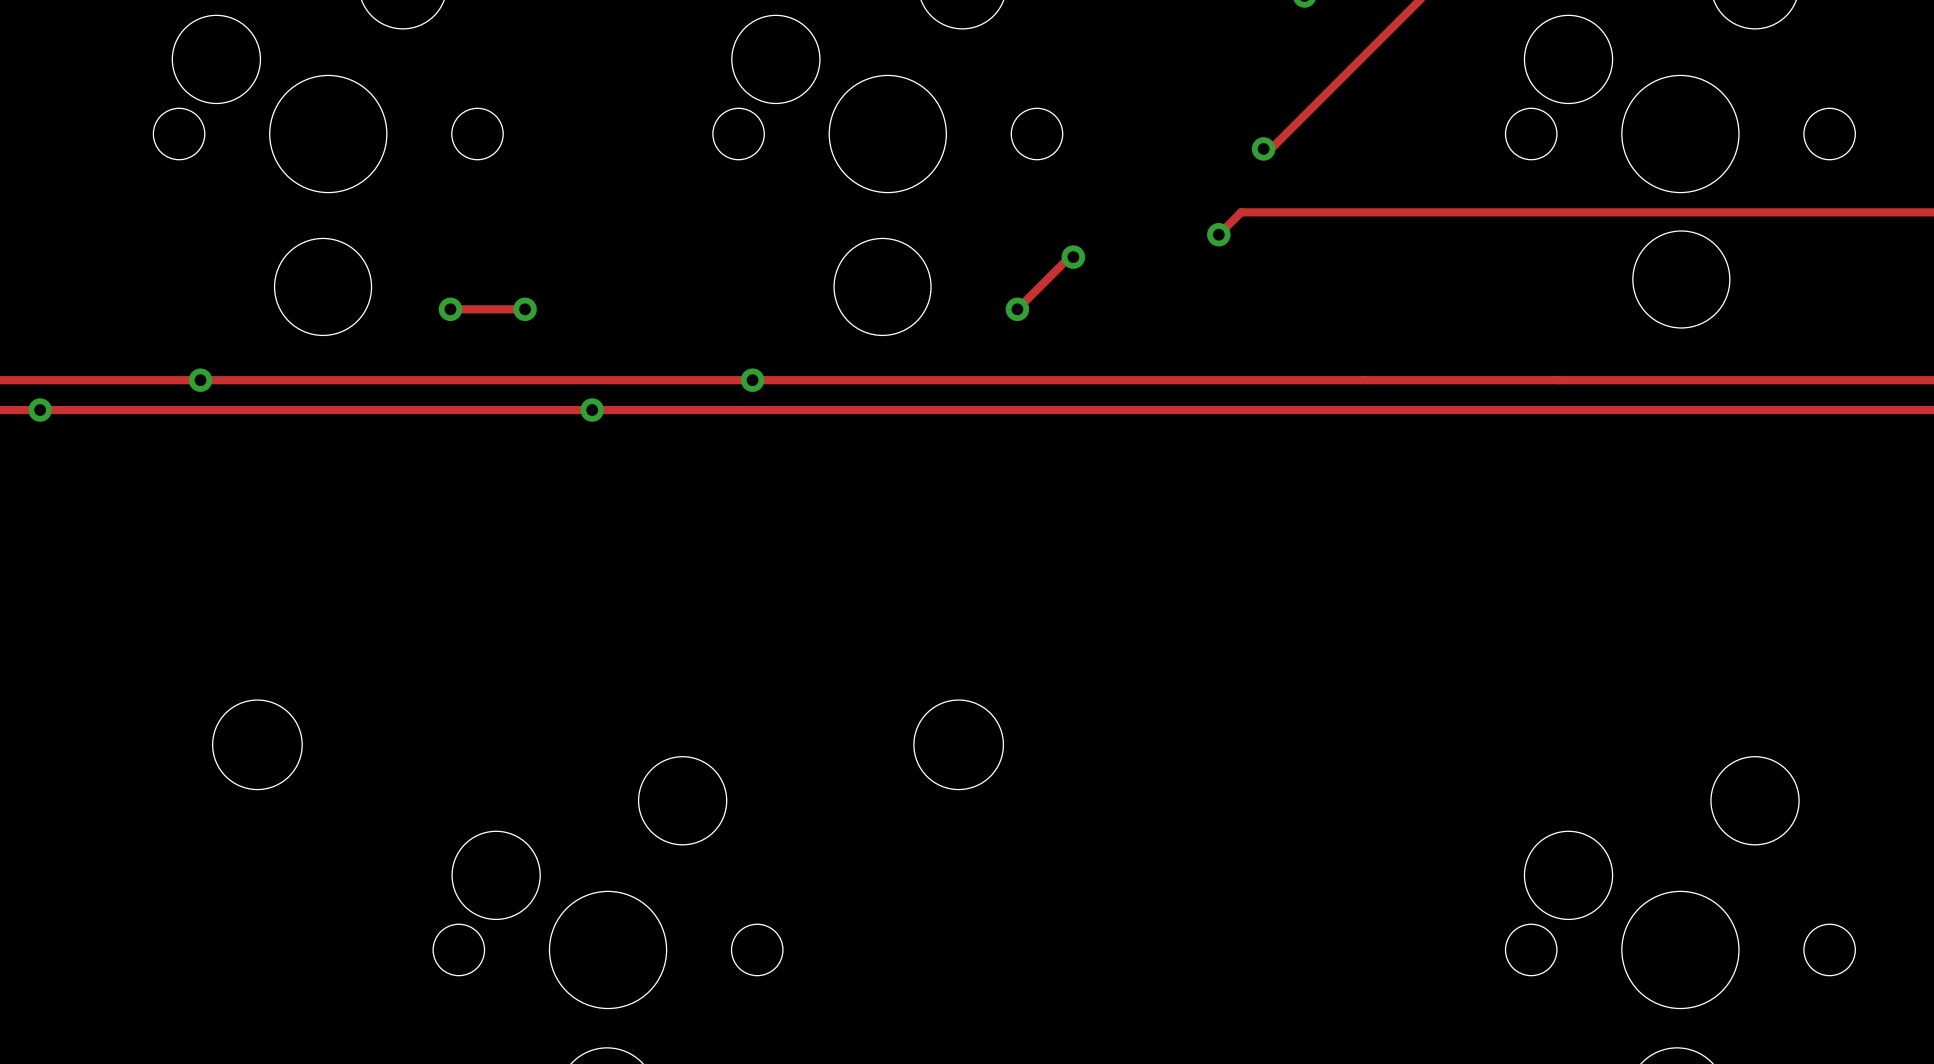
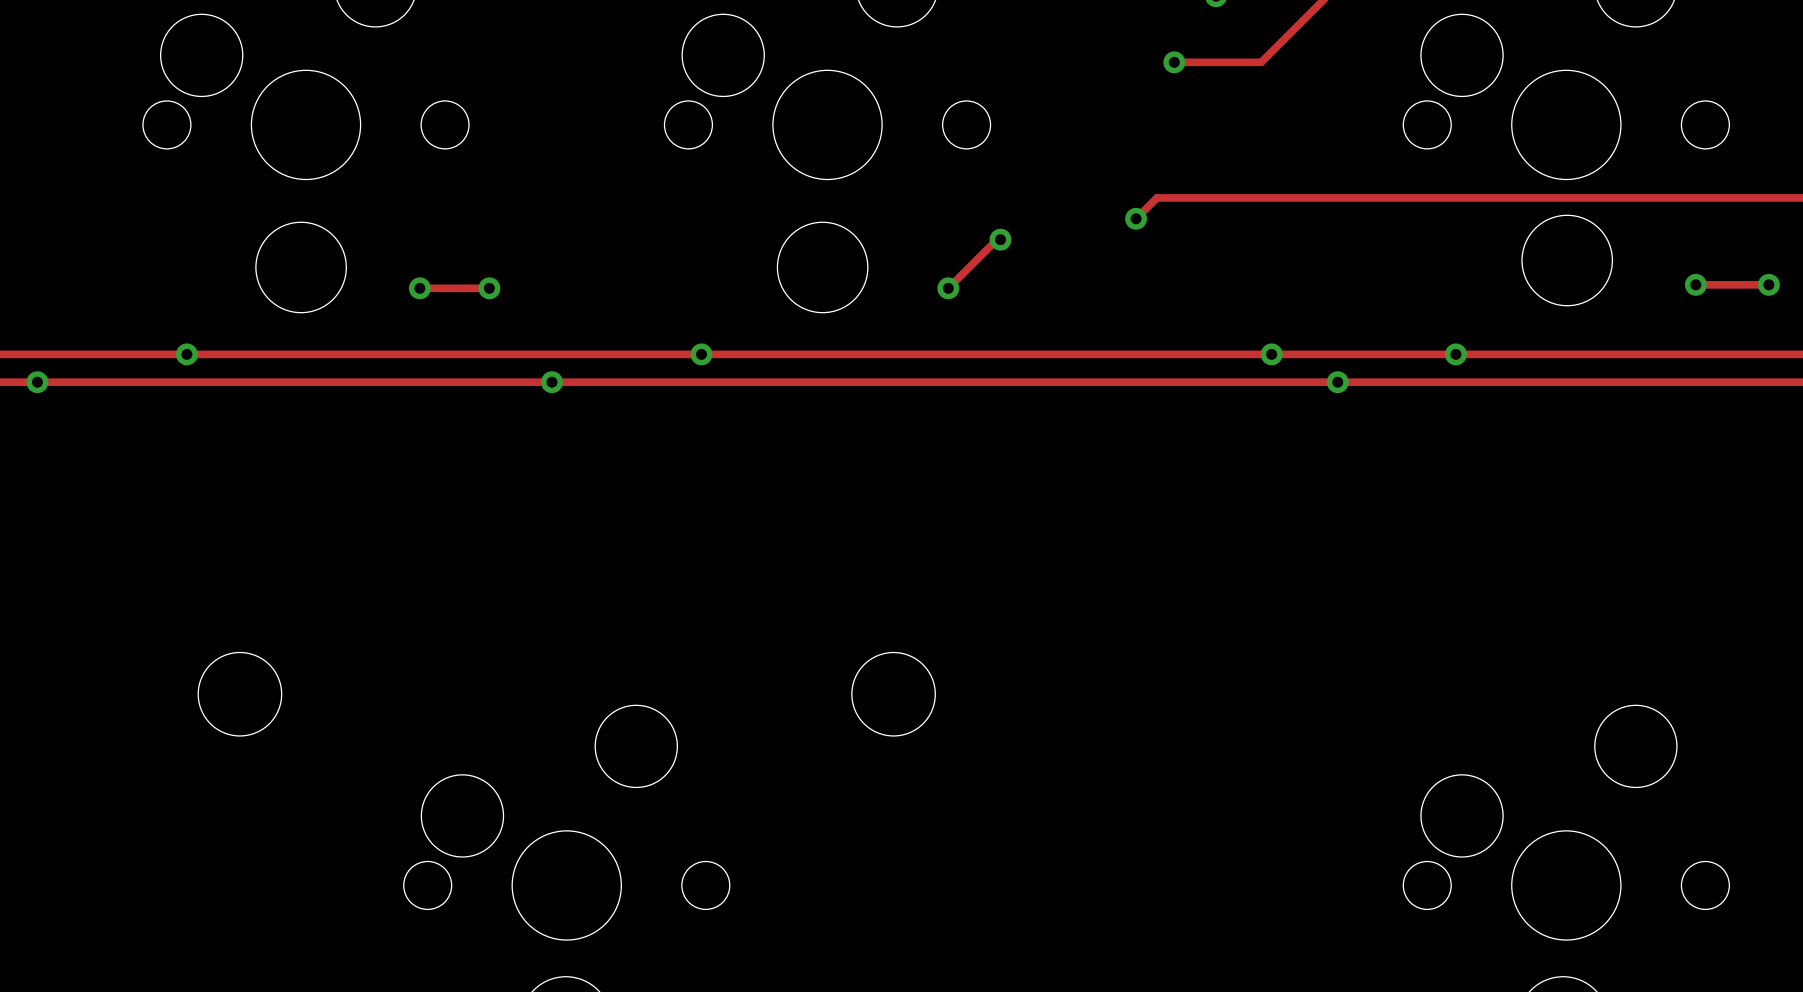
track: (1353, 66) (1271, 148) (1263, 148) -> (1261, 62) (1174, 62)
via position: (1263, 148) -> (1174, 62)
track: none -> (1695, 284) (1768, 284)
via: none -> (1695, 284)
via: none -> (1768, 284)
via: none -> (1271, 354)
via: none -> (1455, 354)
via: none -> (1337, 382)

